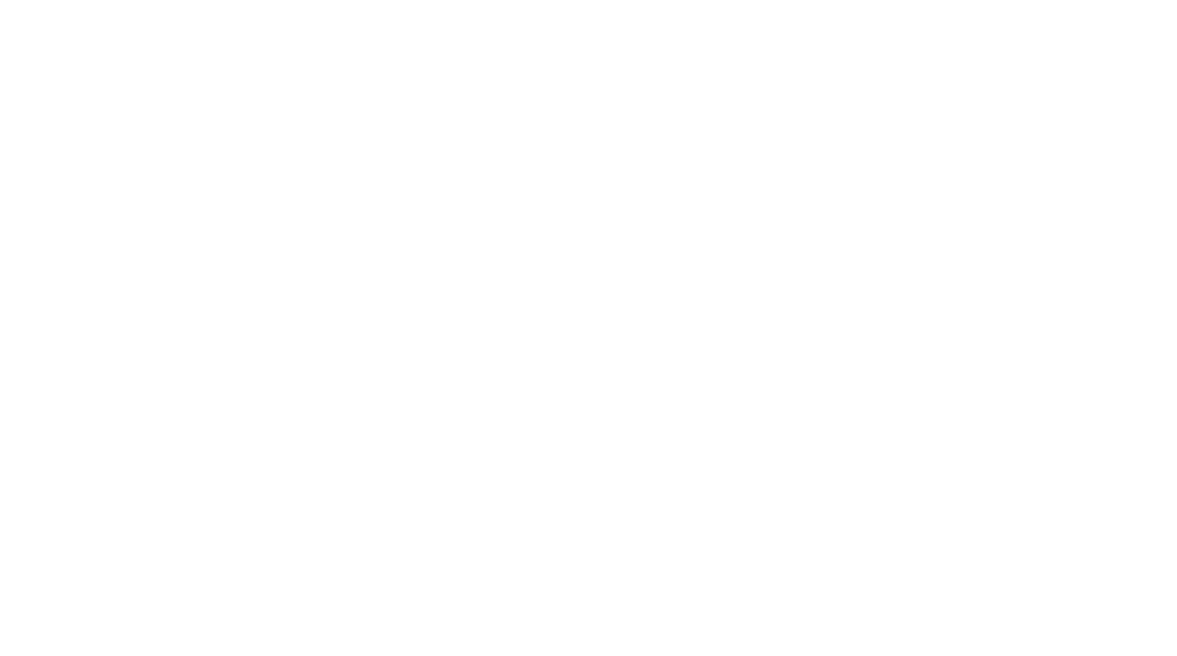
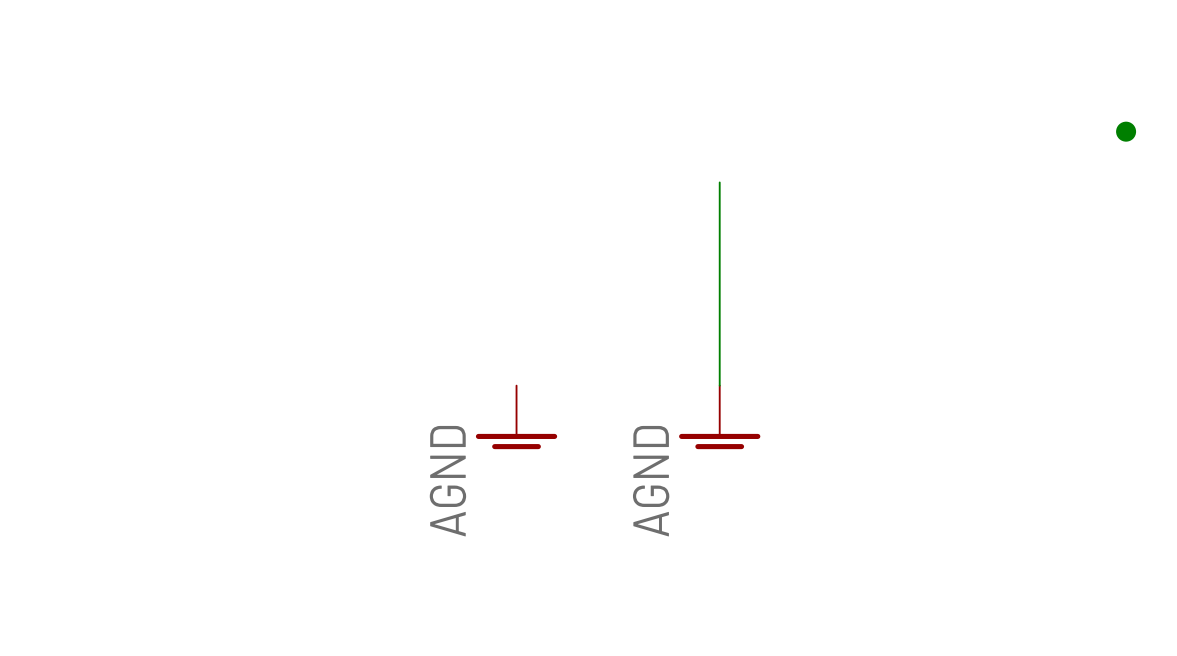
junction: none -> (1126, 131)
wire: none -> (719, 182) (719, 385)
power symbol: none -> AGND (516, 417)
power symbol: none -> AGND (719, 417)

